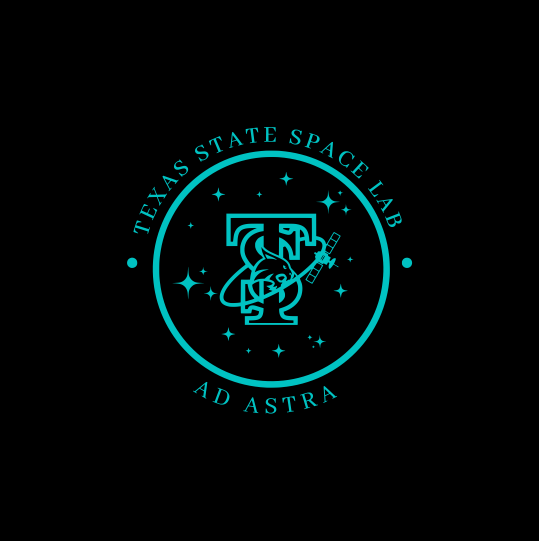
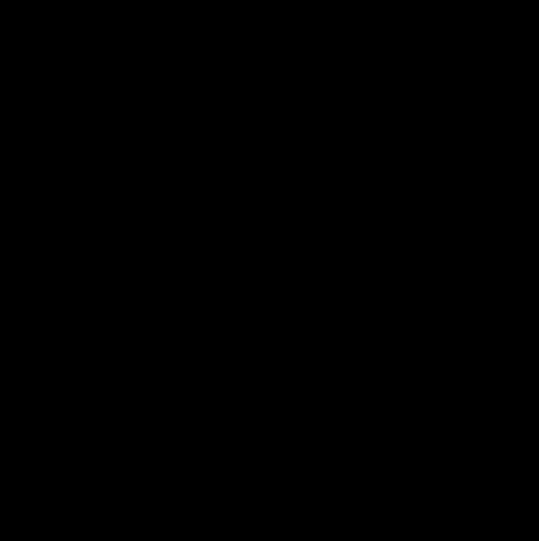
drawing: [127, 127, 413, 414] -> none

